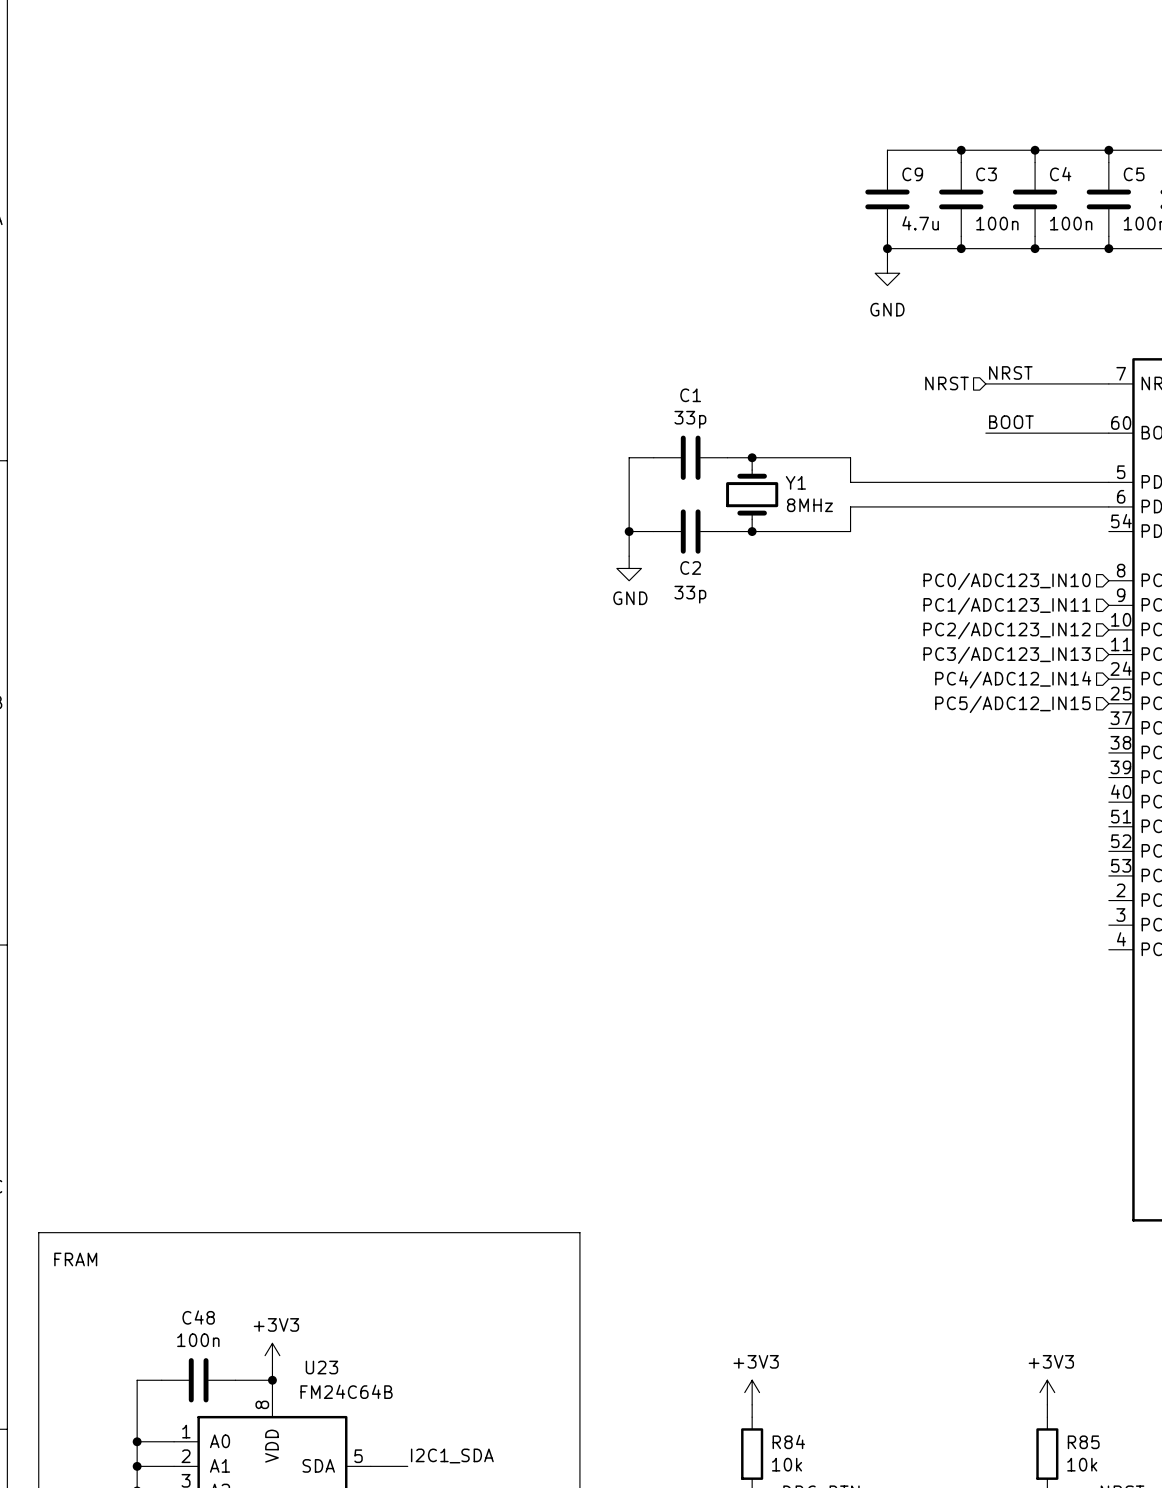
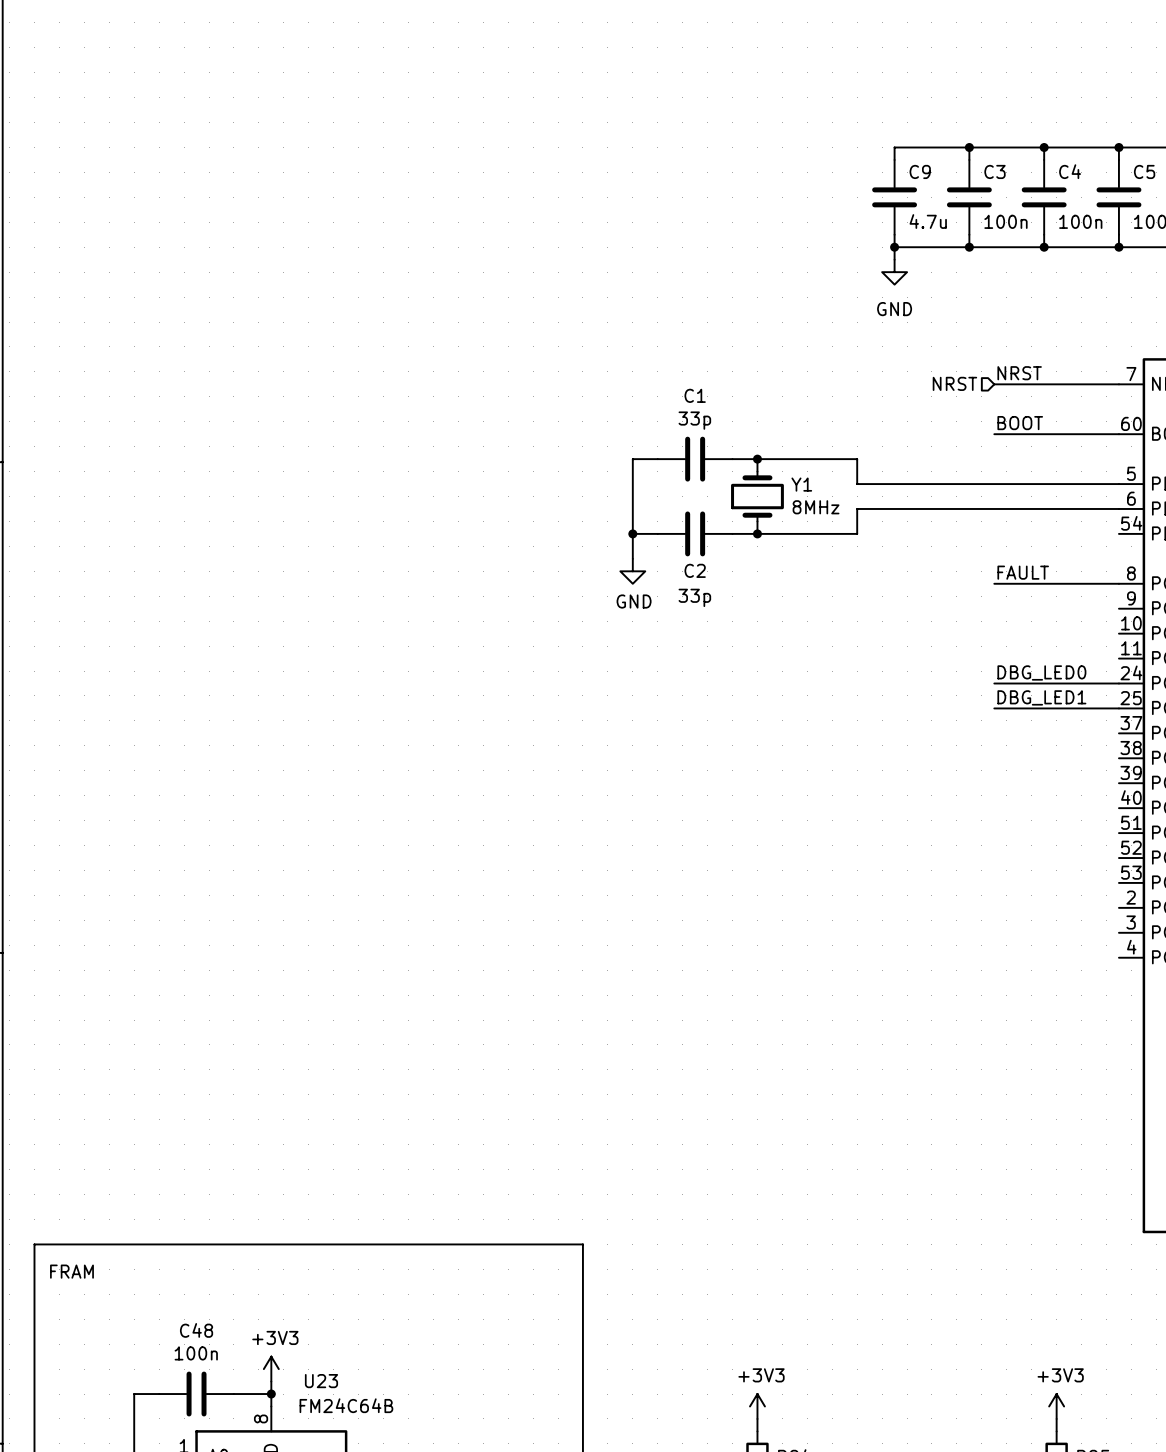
label: none -> FAULT (1023, 572)
wire: none -> (994, 583) (1118, 583)
hierarchical label: PC0/ADC123_IN10 (1007, 581) -> none
hierarchical label: PC1/ADC123_IN11 (1007, 606) -> none
hierarchical label: PC2/ADC123_IN12 (1007, 630) -> none
hierarchical label: PC3/ADC123_IN13 (1007, 655) -> none
label: none -> DBG_LED0 (1041, 672)
wire: none -> (994, 683) (1118, 683)
hierarchical label: PC4/ADC12_IN14 (1013, 679) -> none
label: none -> DBG_LED1 (1041, 697)
wire: none -> (994, 708) (1118, 708)
hierarchical label: PC5/ADC12_IN15 (1012, 704) -> none

